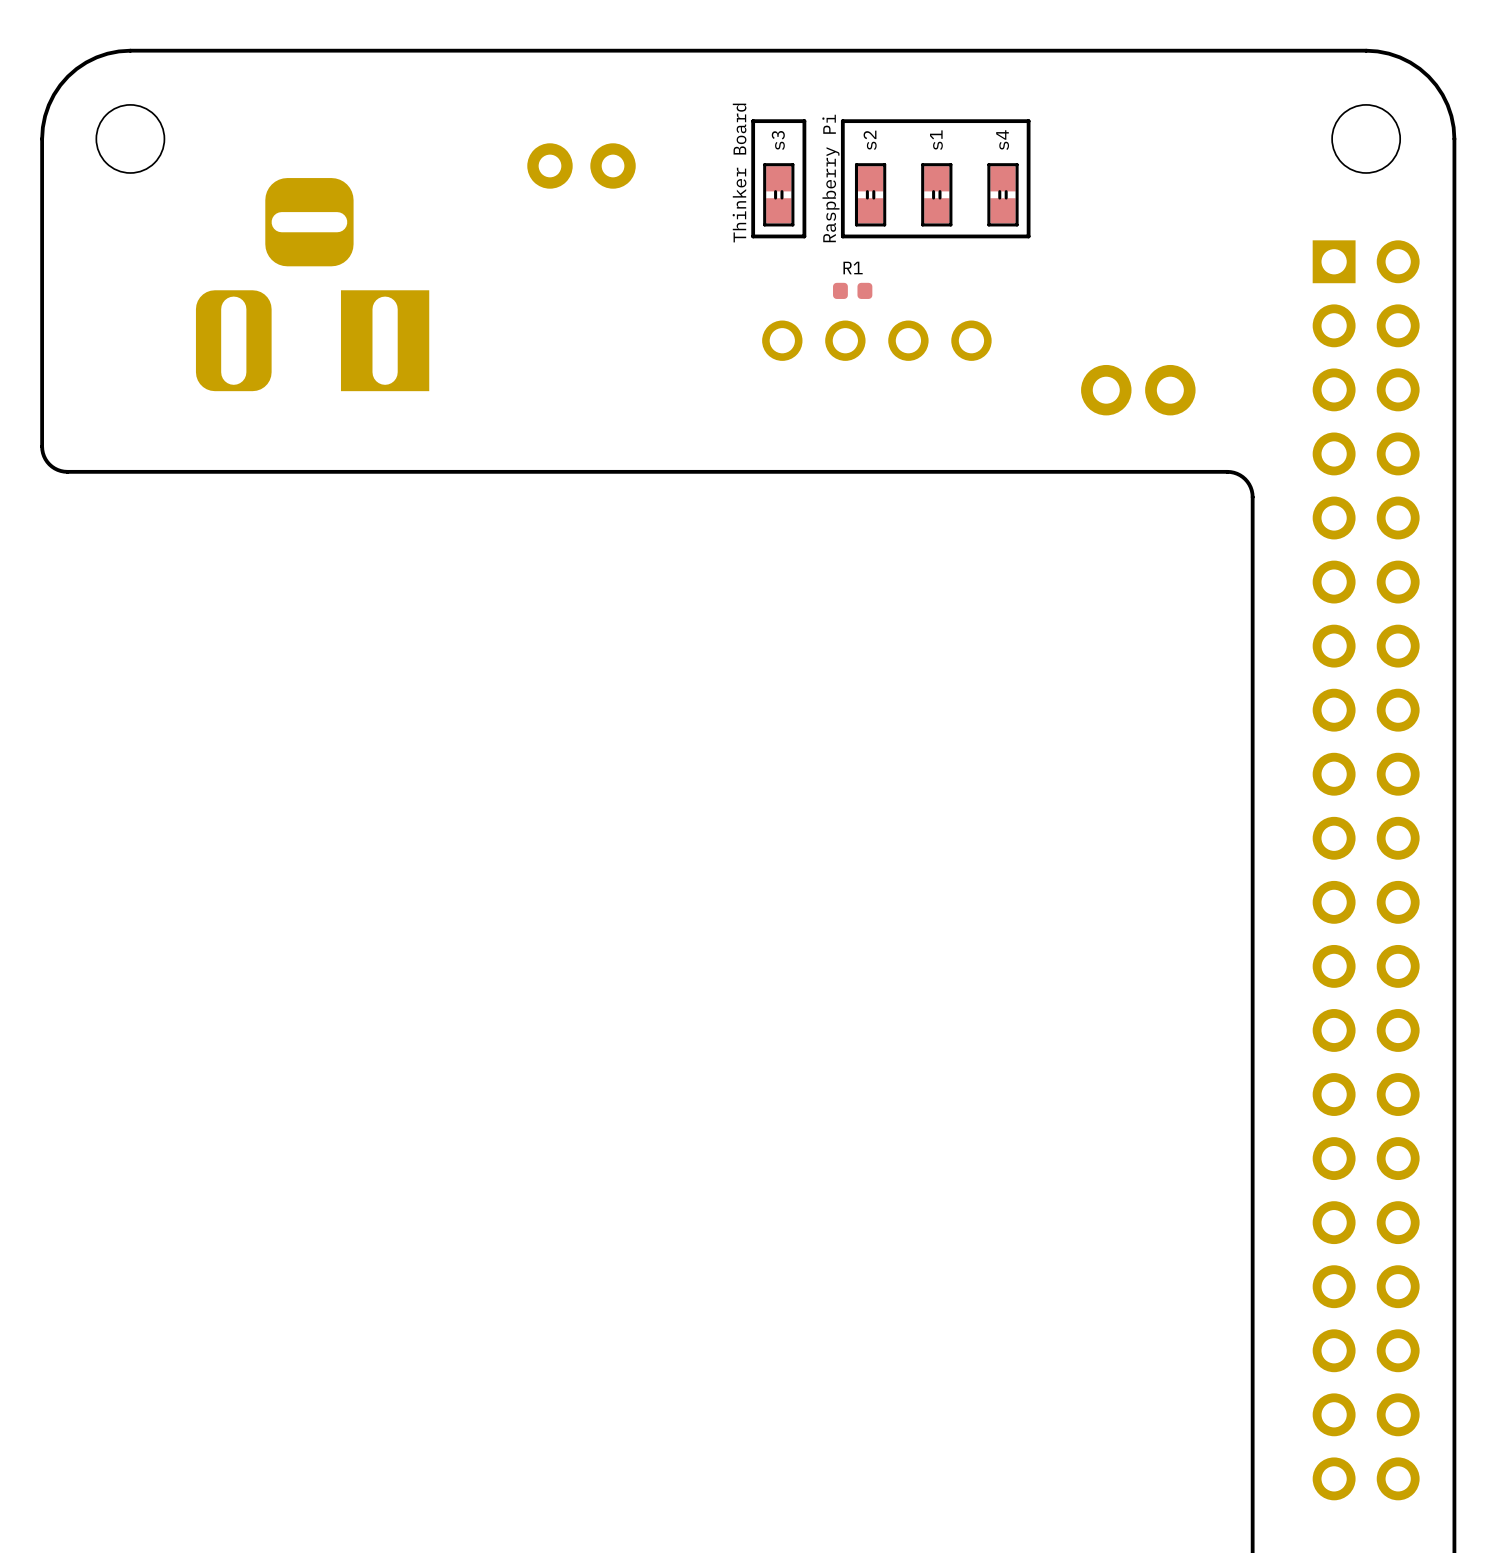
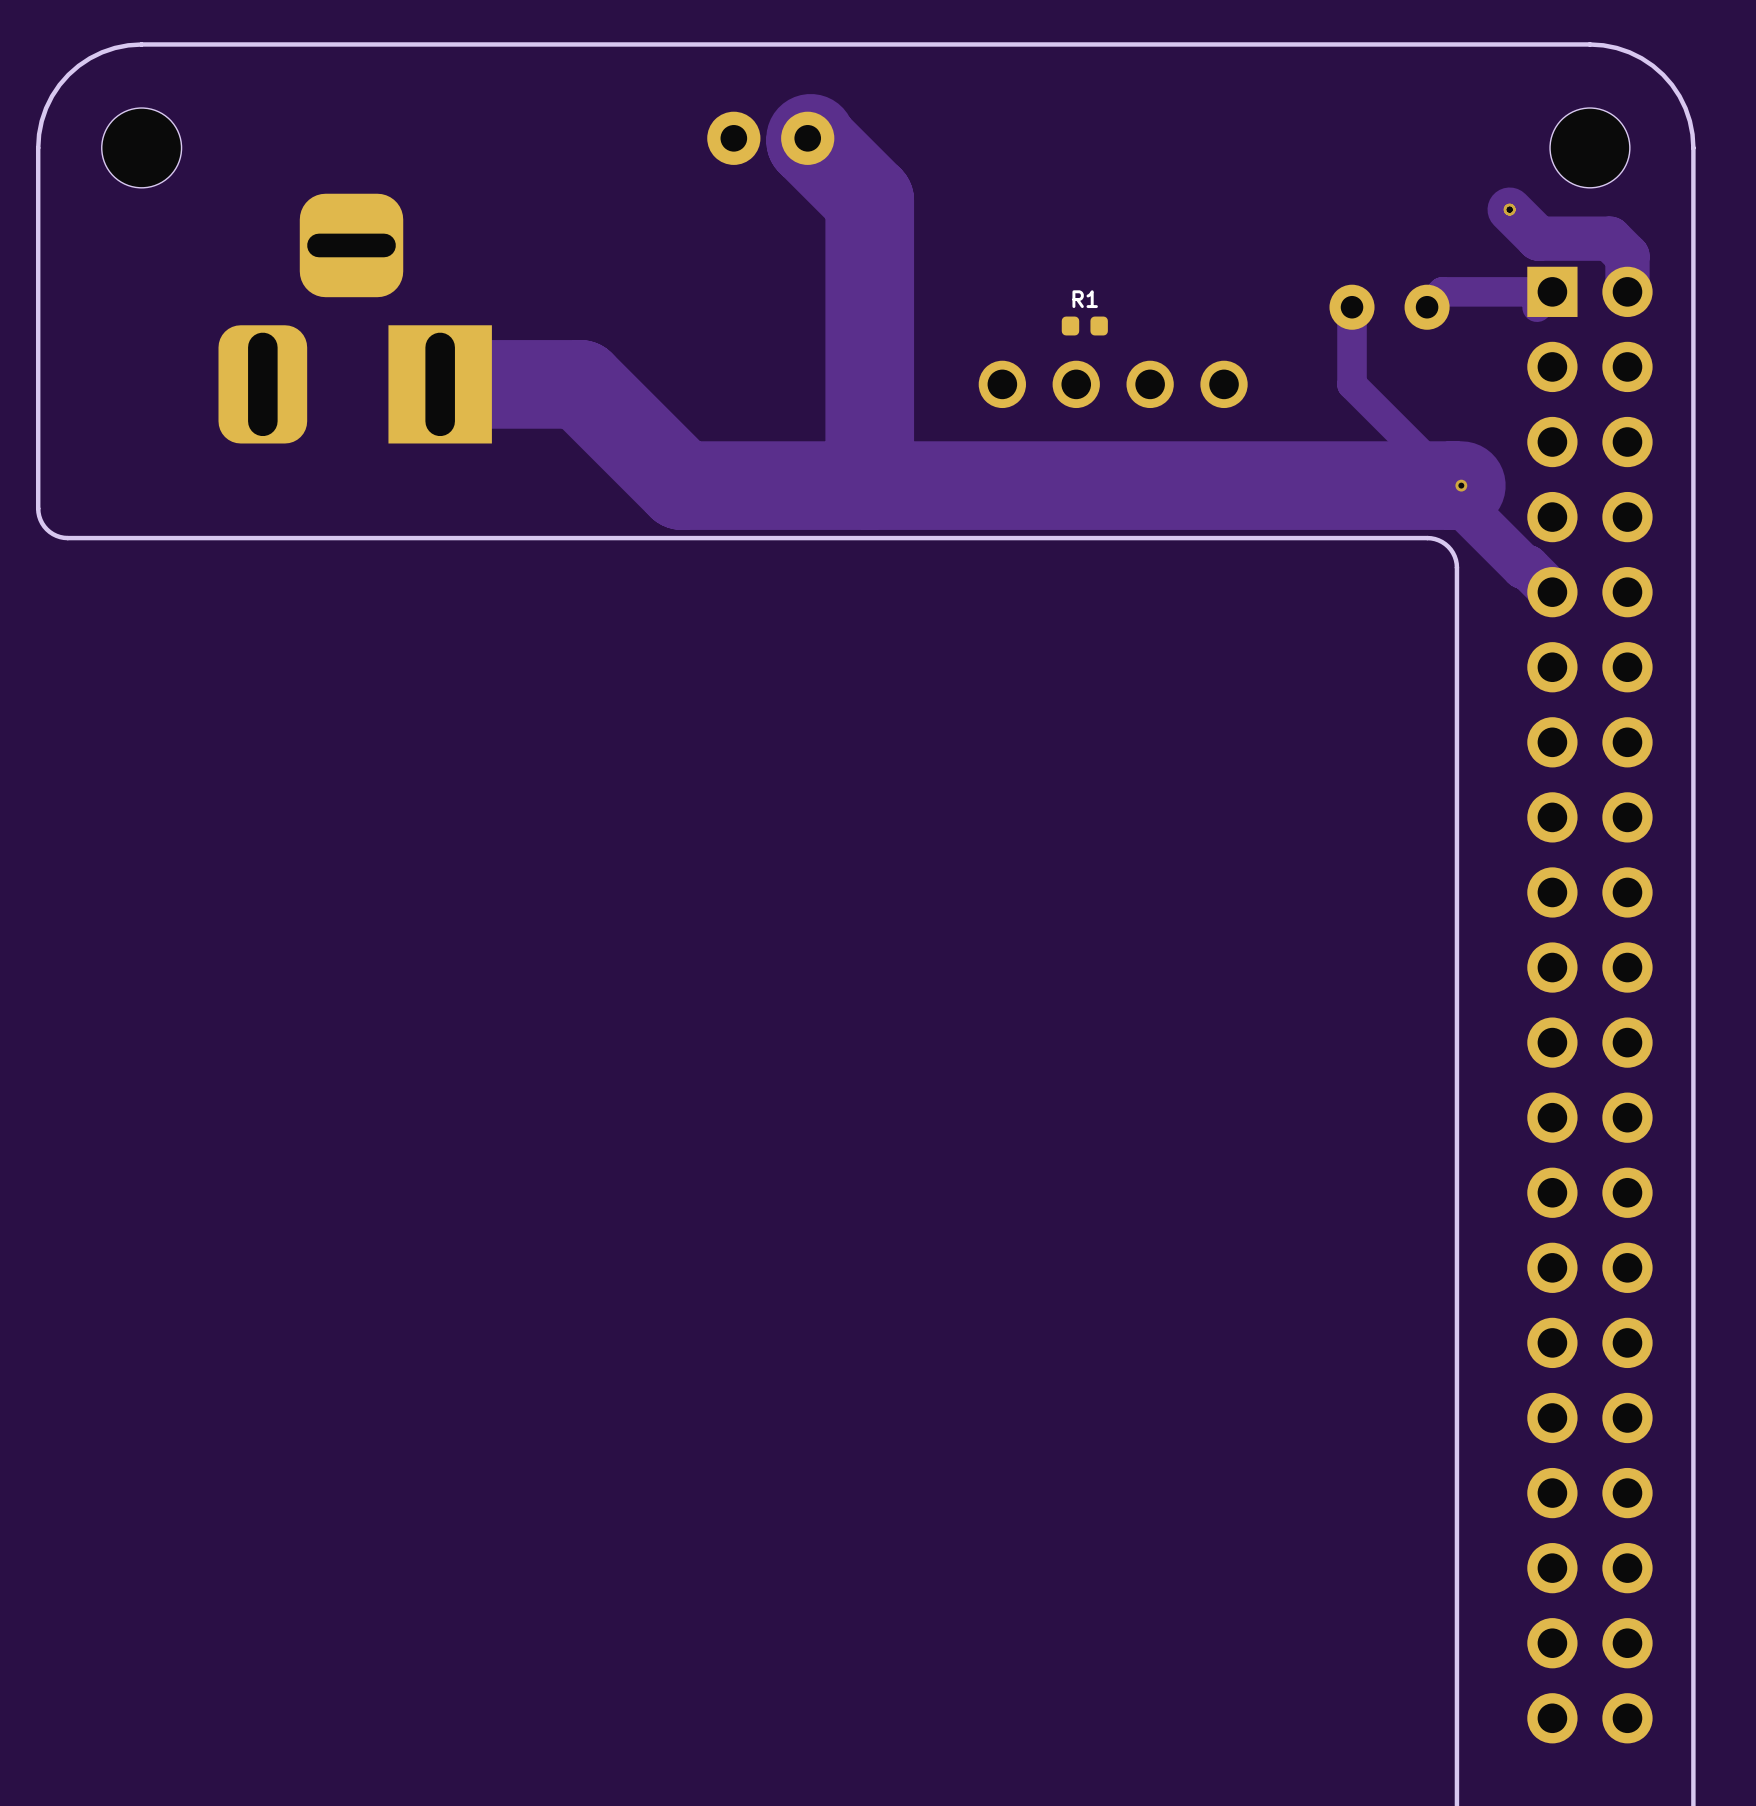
line: (753, 121) (753, 236) (804, 236) (804, 121) (753, 121) -> none
line: (842, 121) (1028, 121) (1028, 236) (842, 236) (842, 121) -> none
track: none -> (810, 138) (810, 141) (869, 200) (869, 485)
part position: (581, 165) -> (770, 138)
text: Thinker Board (739, 173) -> none
text: Raspberry Pi (830, 178) -> none
track: none -> (1509, 209) (1538, 238) (1609, 238) (1627, 256) (1627, 291)
via: none -> (1509, 209)
s3: (778, 194) -> none
s2: (870, 194) -> none
s1: (936, 194) -> none
s4: (1002, 194) -> none
track: none -> (1352, 307) (1352, 384) (1452, 485)
part: none -> (1389, 307)
track: none -> (1427, 307) (1442, 291) (1552, 291) (1537, 307)
R1 position: (852, 290) -> (1084, 326)
track: none -> (440, 384) (580, 384) (681, 485) (1461, 485) (1461, 504) (1523, 567) (1527, 567) (1552, 592)
part position: (876, 340) -> (1113, 384)
part: (1138, 390) -> none
via: none -> (1461, 485)

